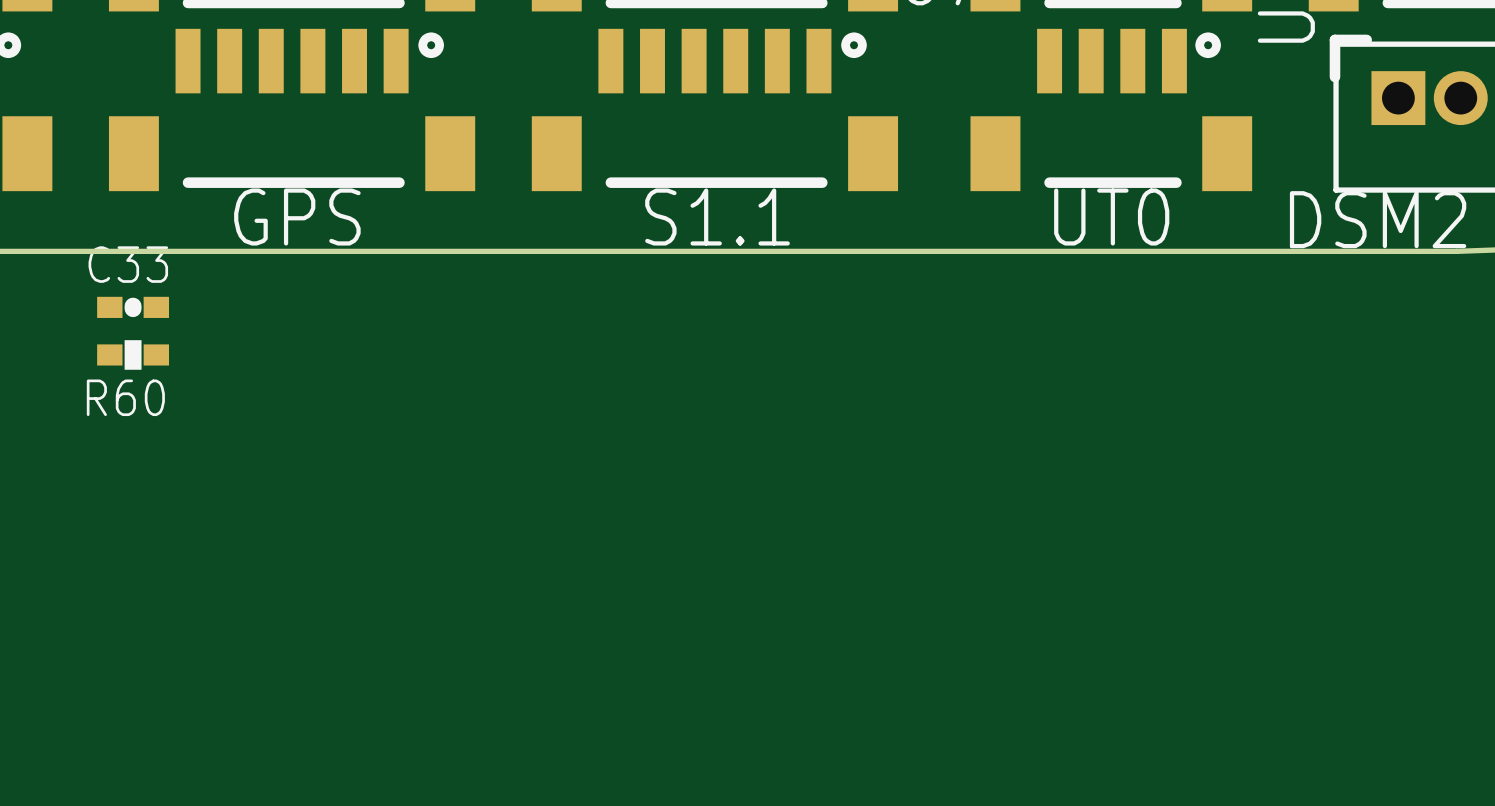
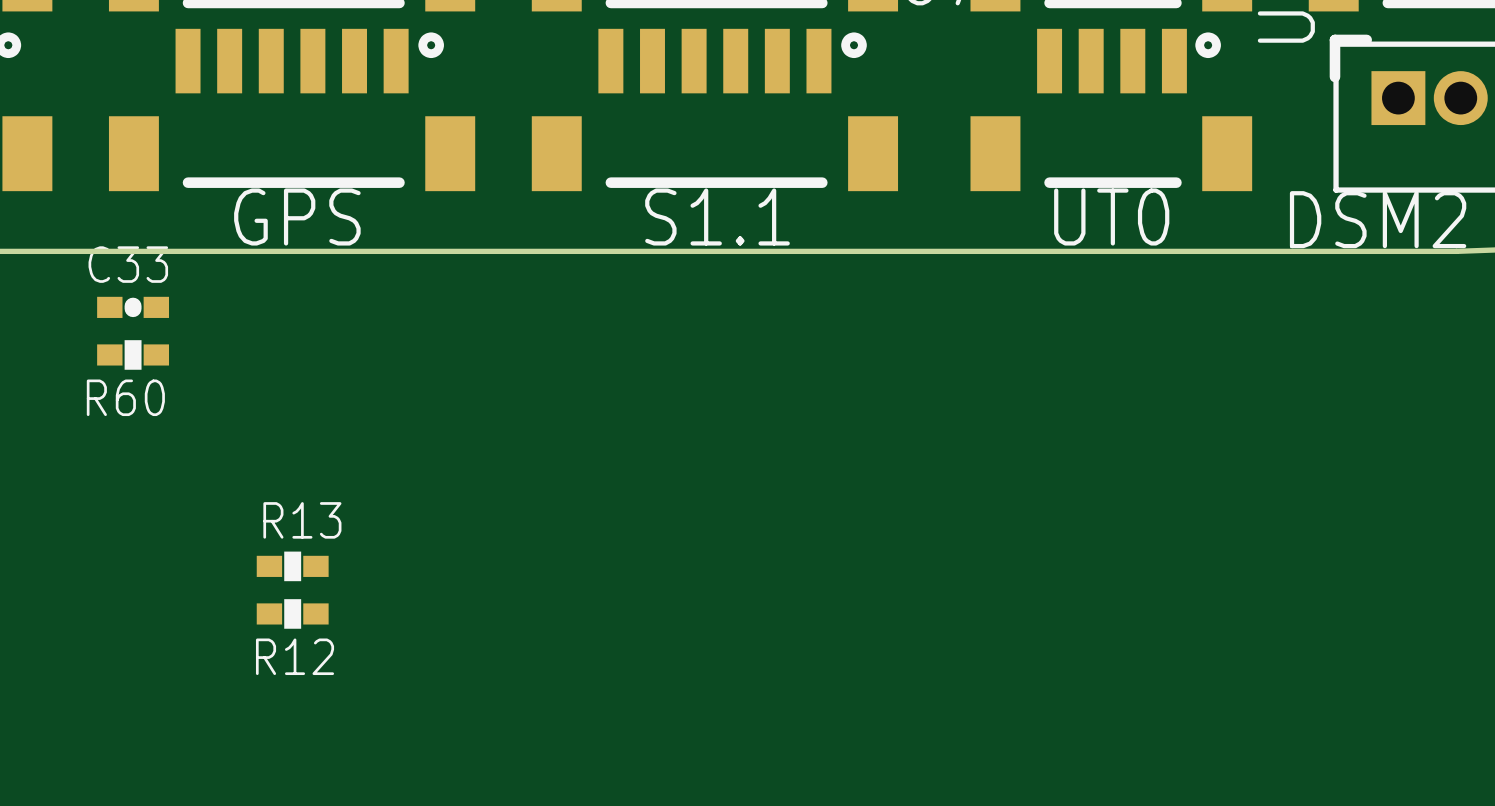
R13: none -> (292, 566)
R12: none -> (292, 613)

